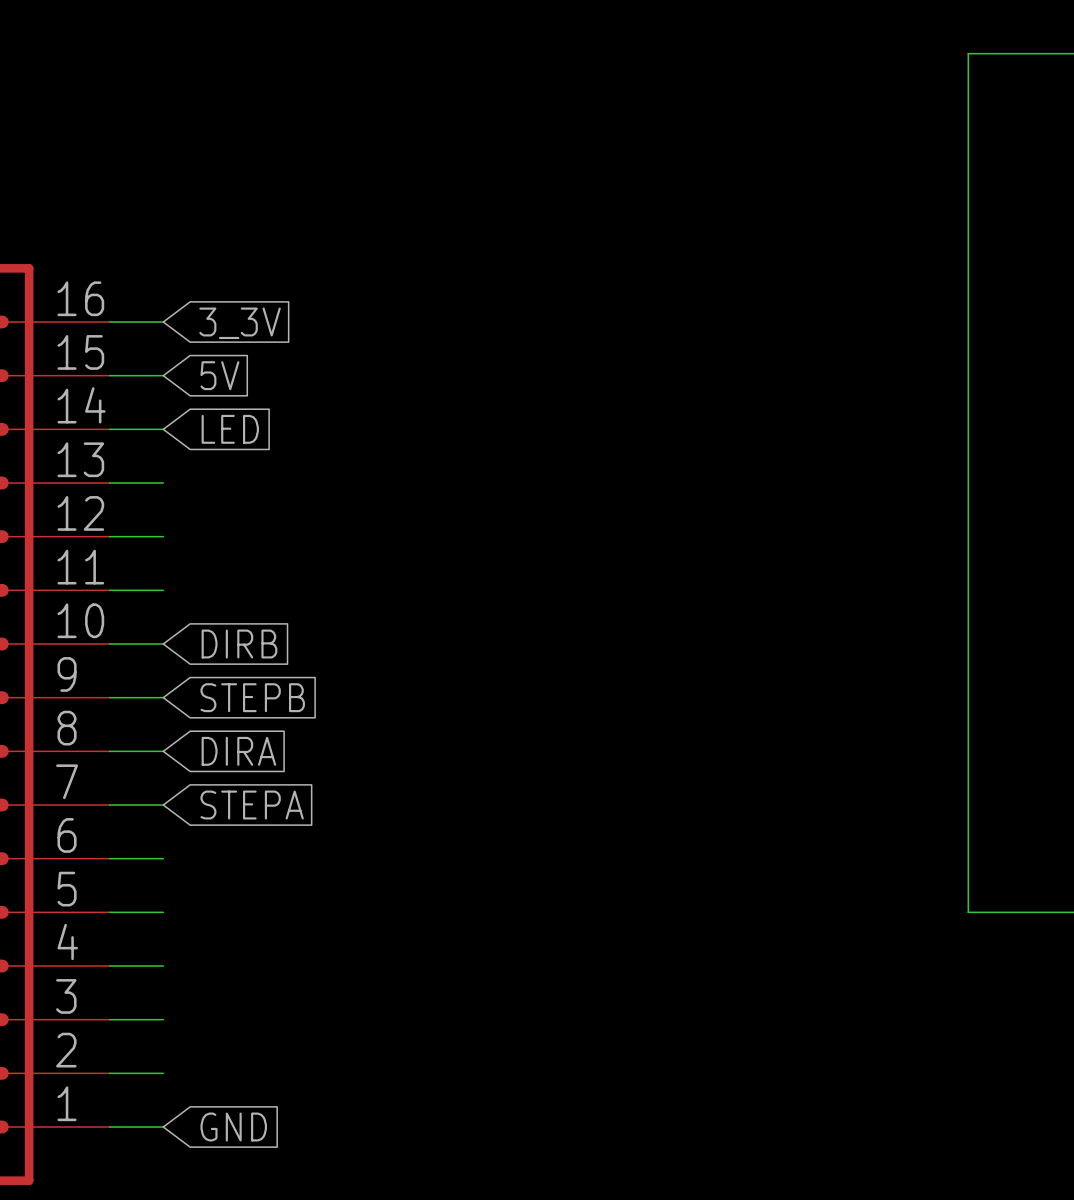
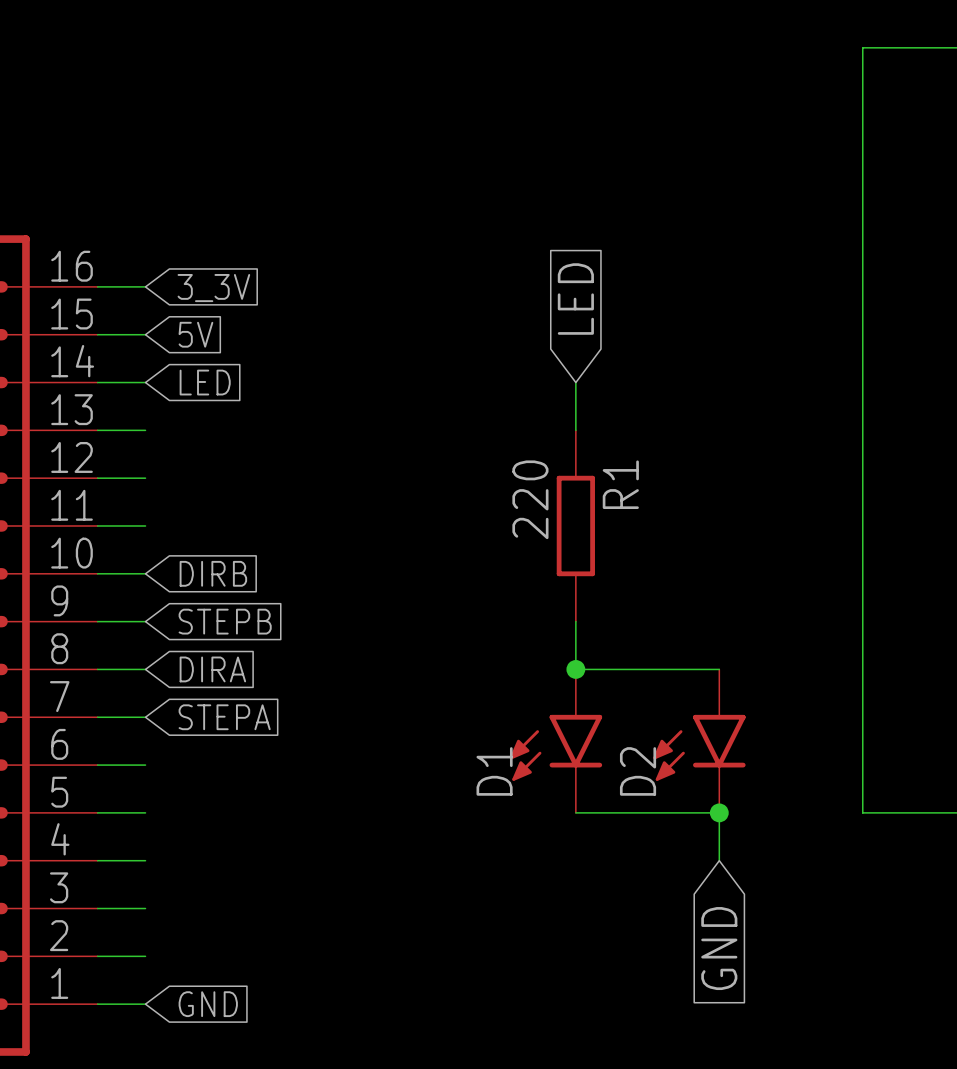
global label: none -> LED (575, 299)
wire: none -> (575, 382) (575, 430)
R1: none -> 220 (575, 525)
wire: none -> (575, 621) (575, 669) (719, 669)
junction: none -> (575, 669)
D1: none -> (556, 741)
D2: none -> (699, 741)
wire: none -> (575, 812) (719, 812) (719, 860)
junction: none -> (719, 812)
global label: none -> GND (719, 948)

